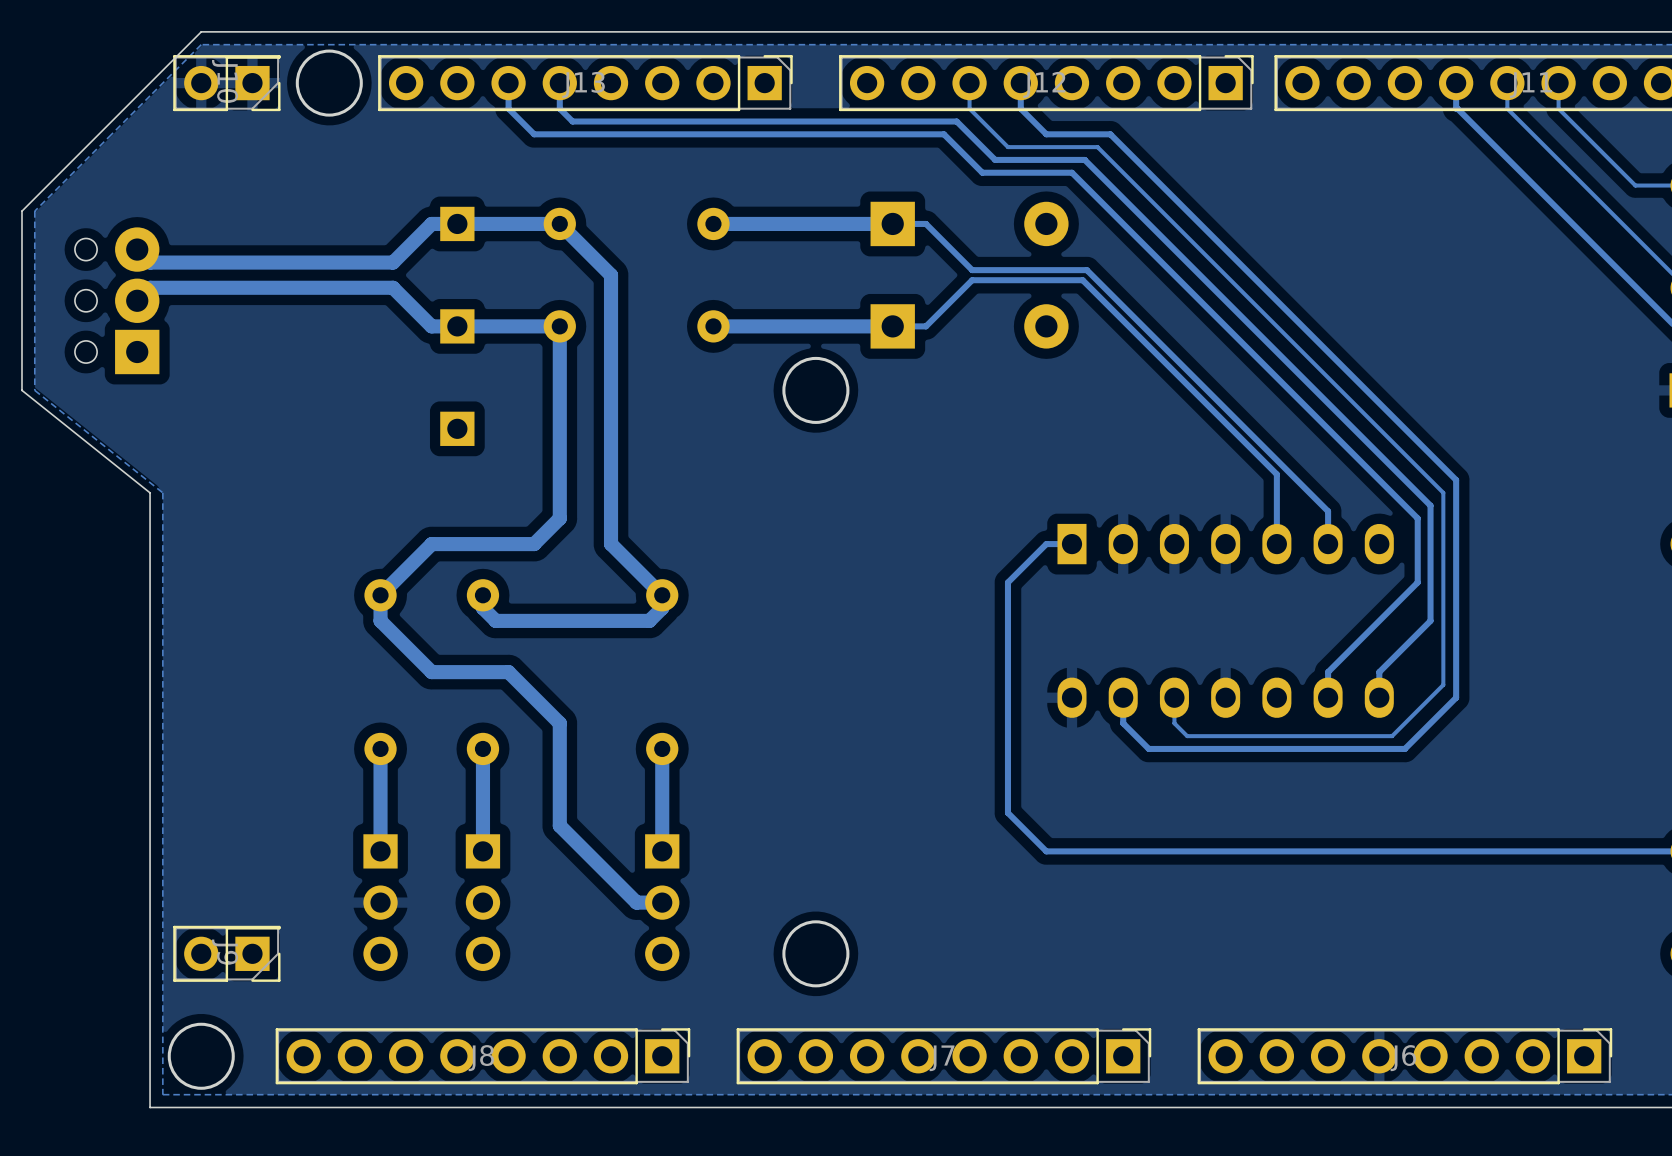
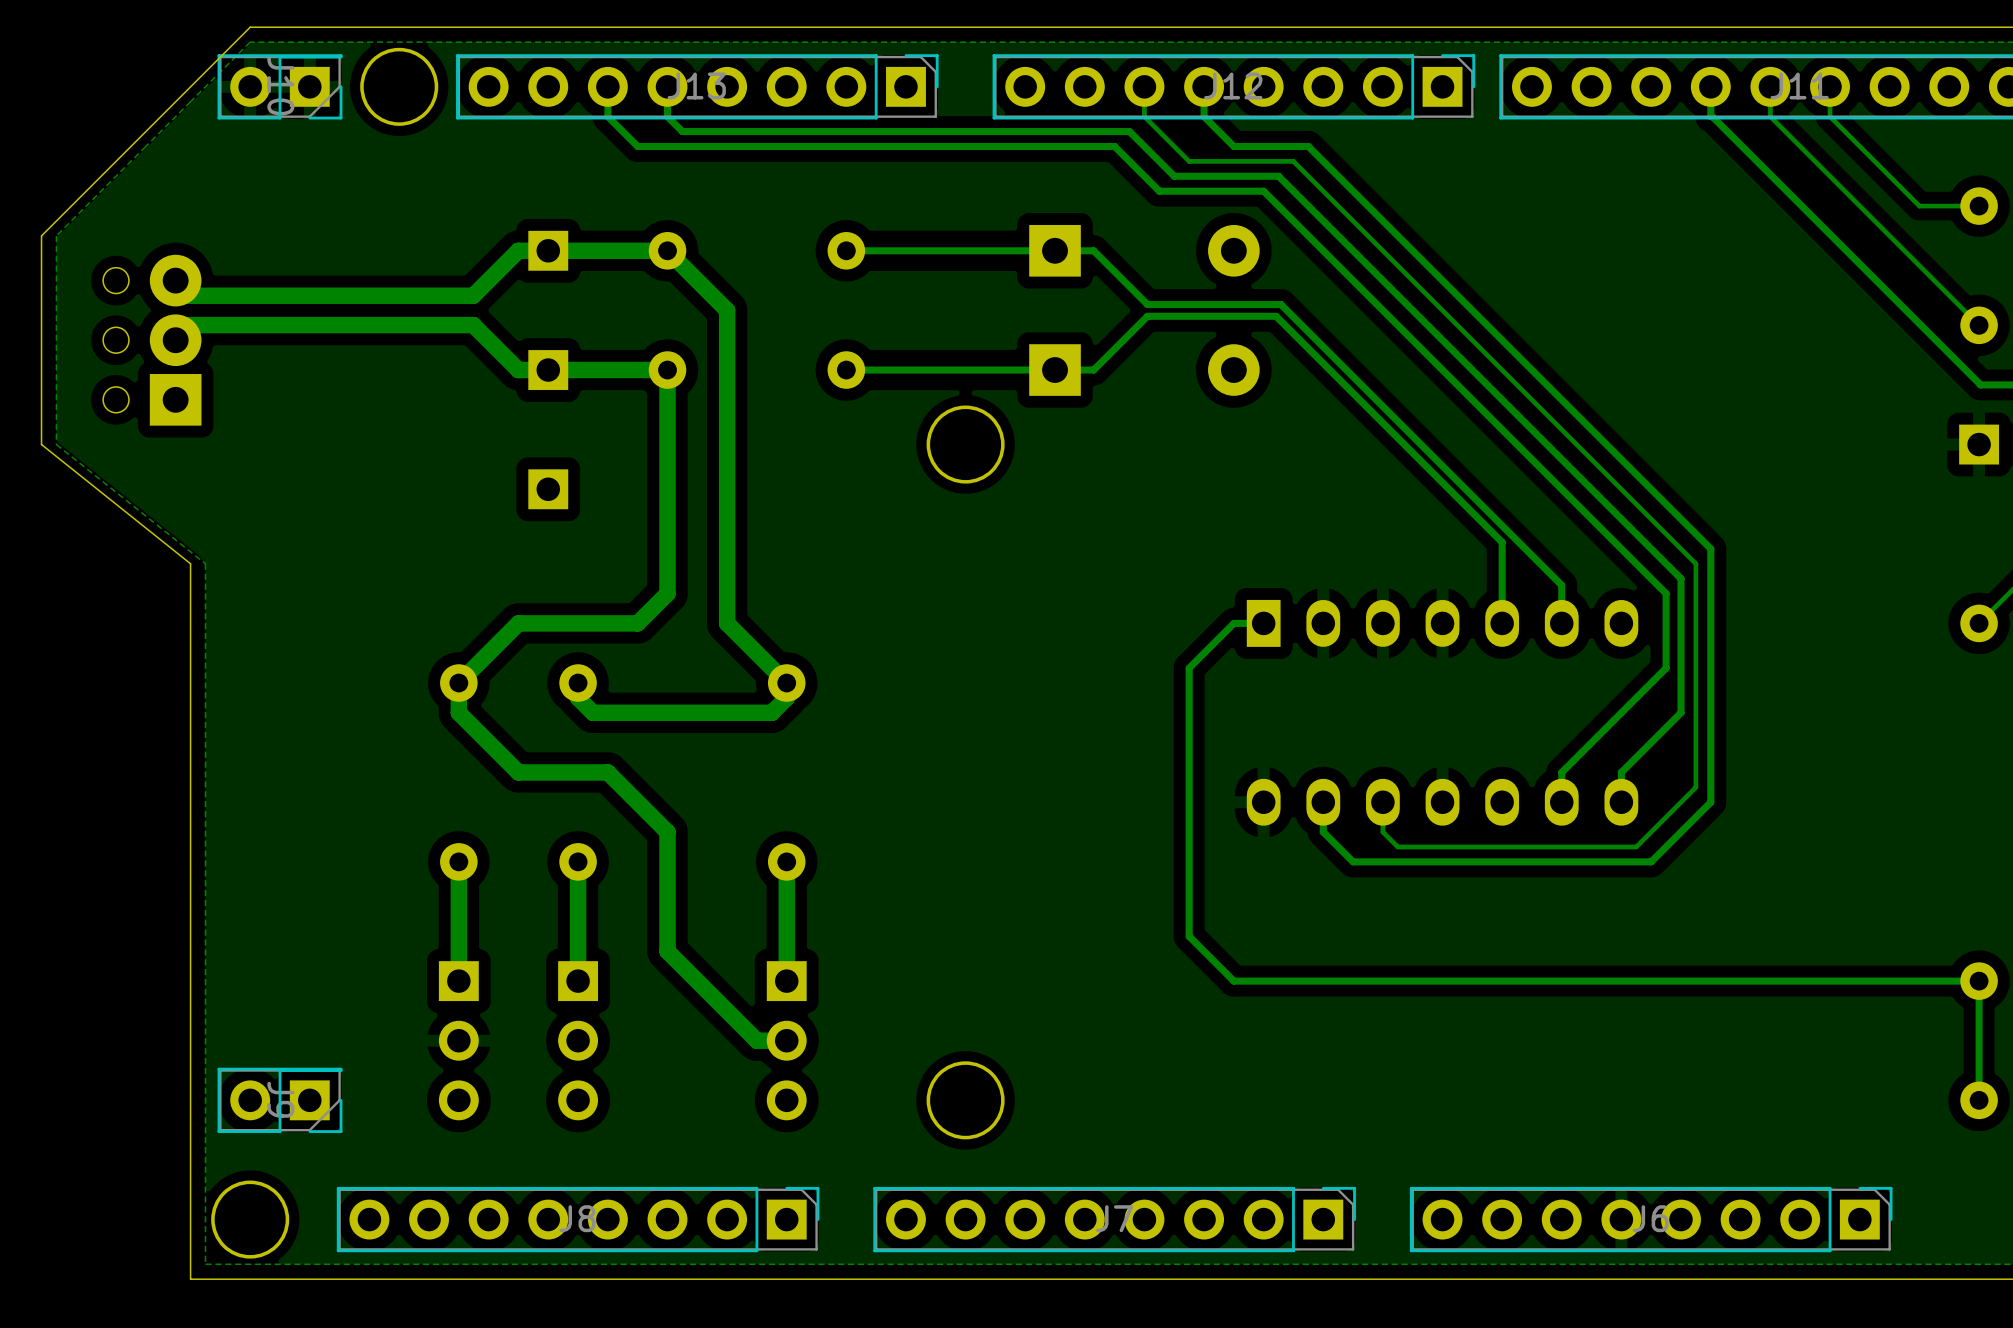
track width: thick (892, 223) (713, 223) -> thin (1055, 250) (846, 250)
track width: thick (892, 326) (713, 326) -> thin (1055, 370) (846, 370)

